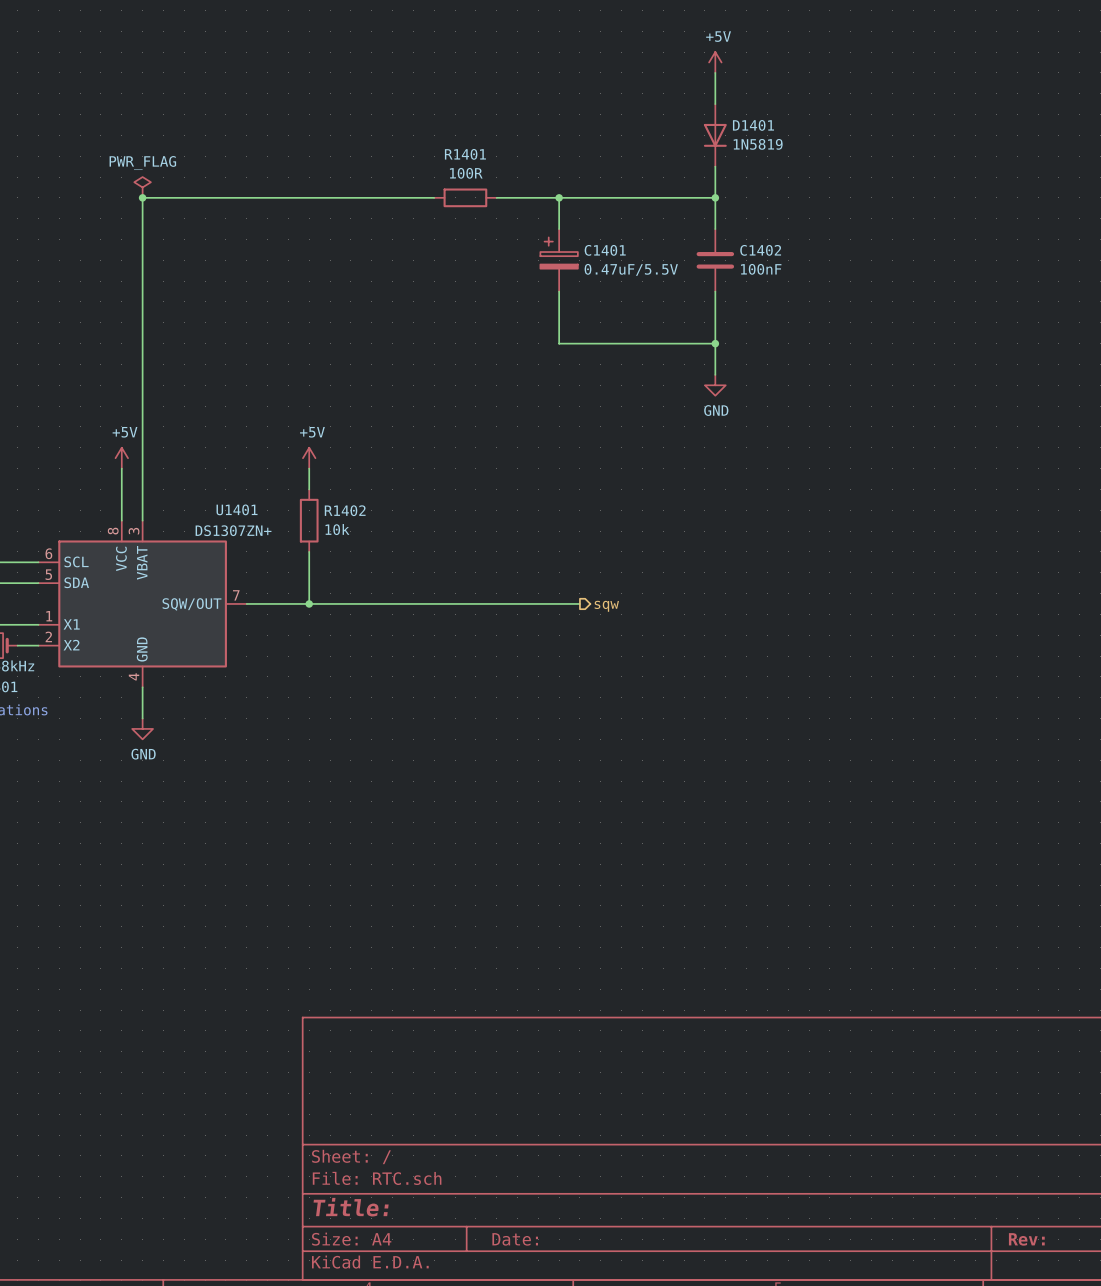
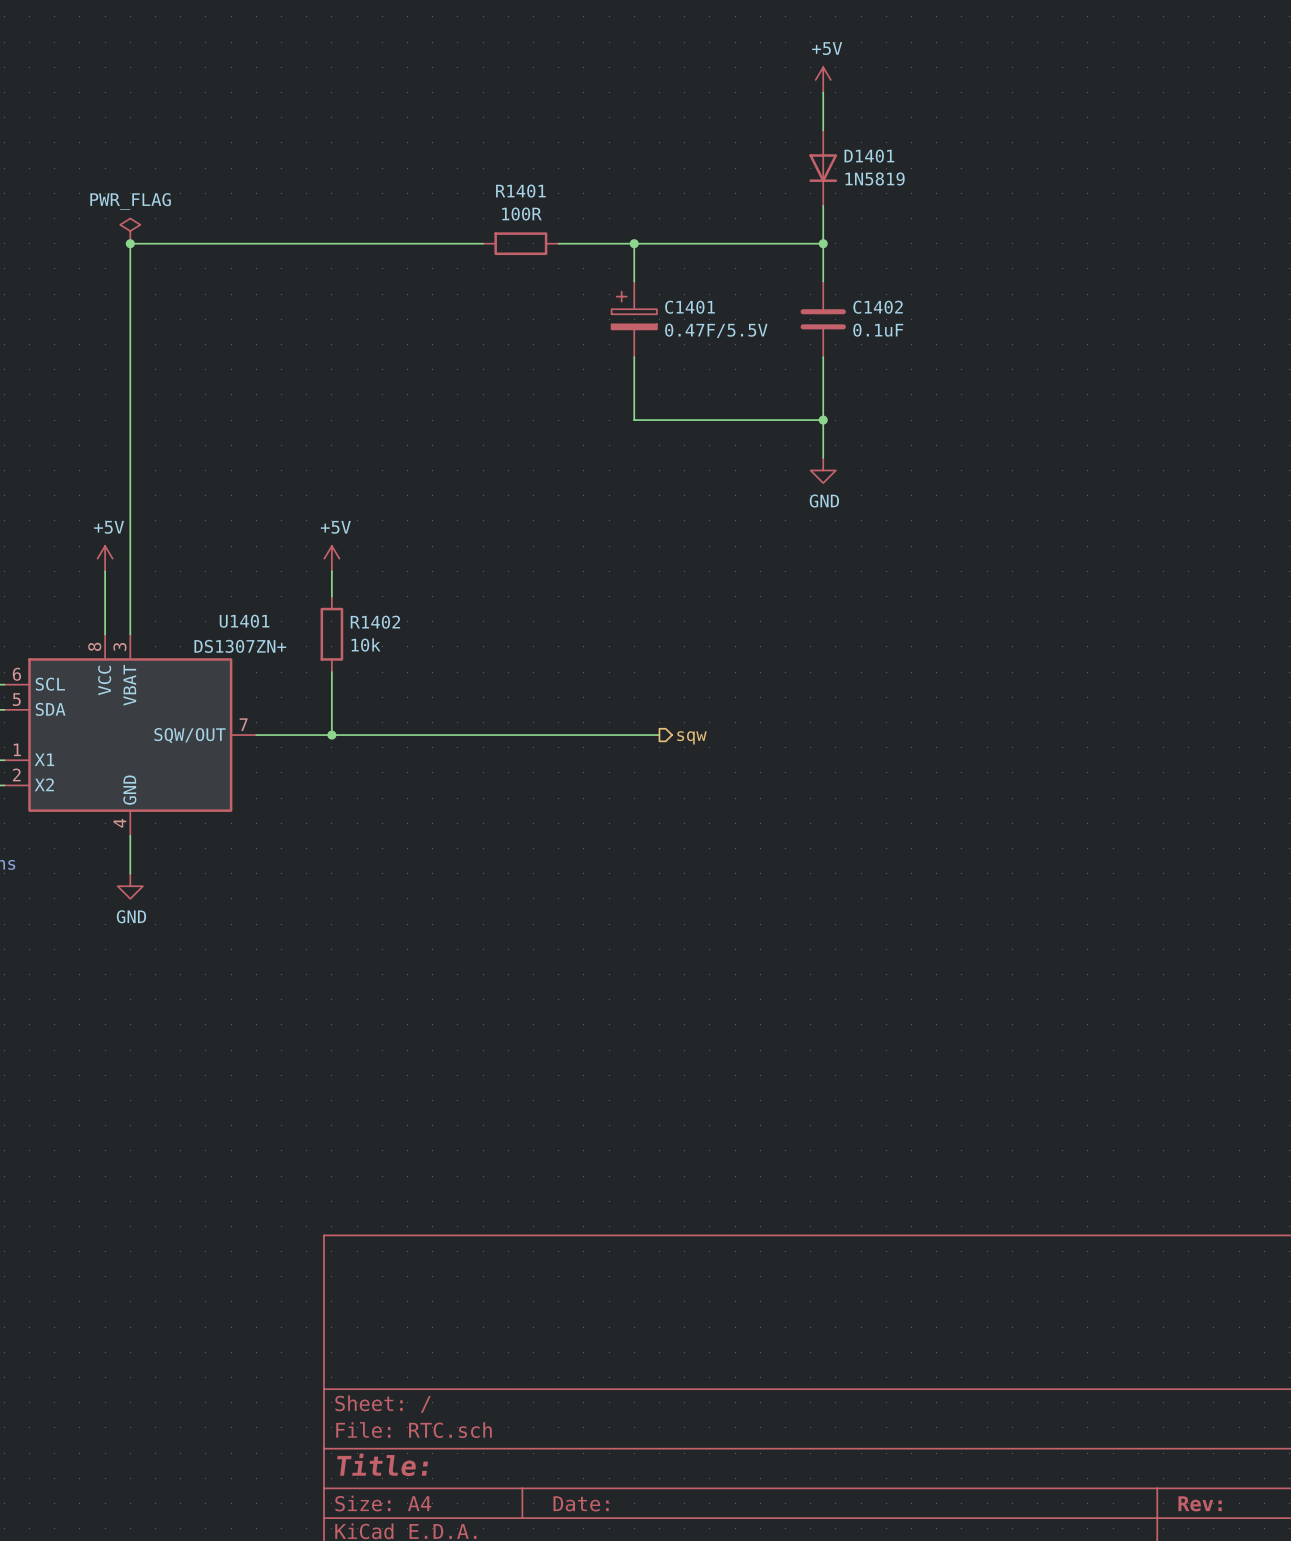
C1401 value: 0.47uF/5.5V (631, 269) -> 0.47F/5.5V (716, 330)
C1402 value: 100nF (761, 269) -> 0.1uF (878, 330)

